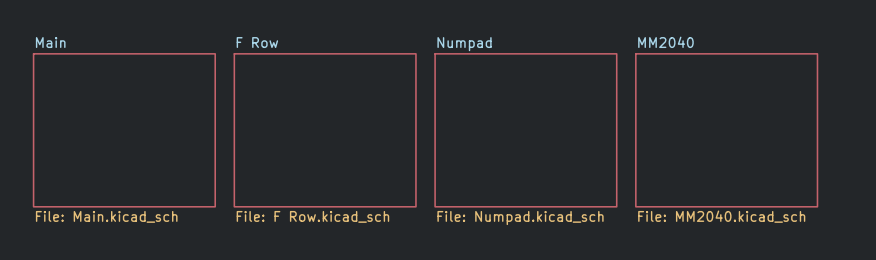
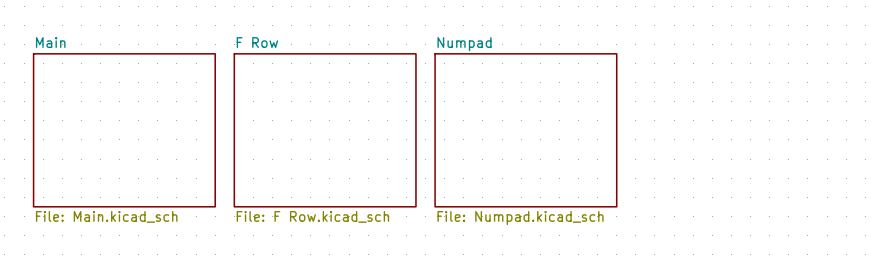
sheet MM2040: File: MM2040.kicad_sch (726, 130) -> none

